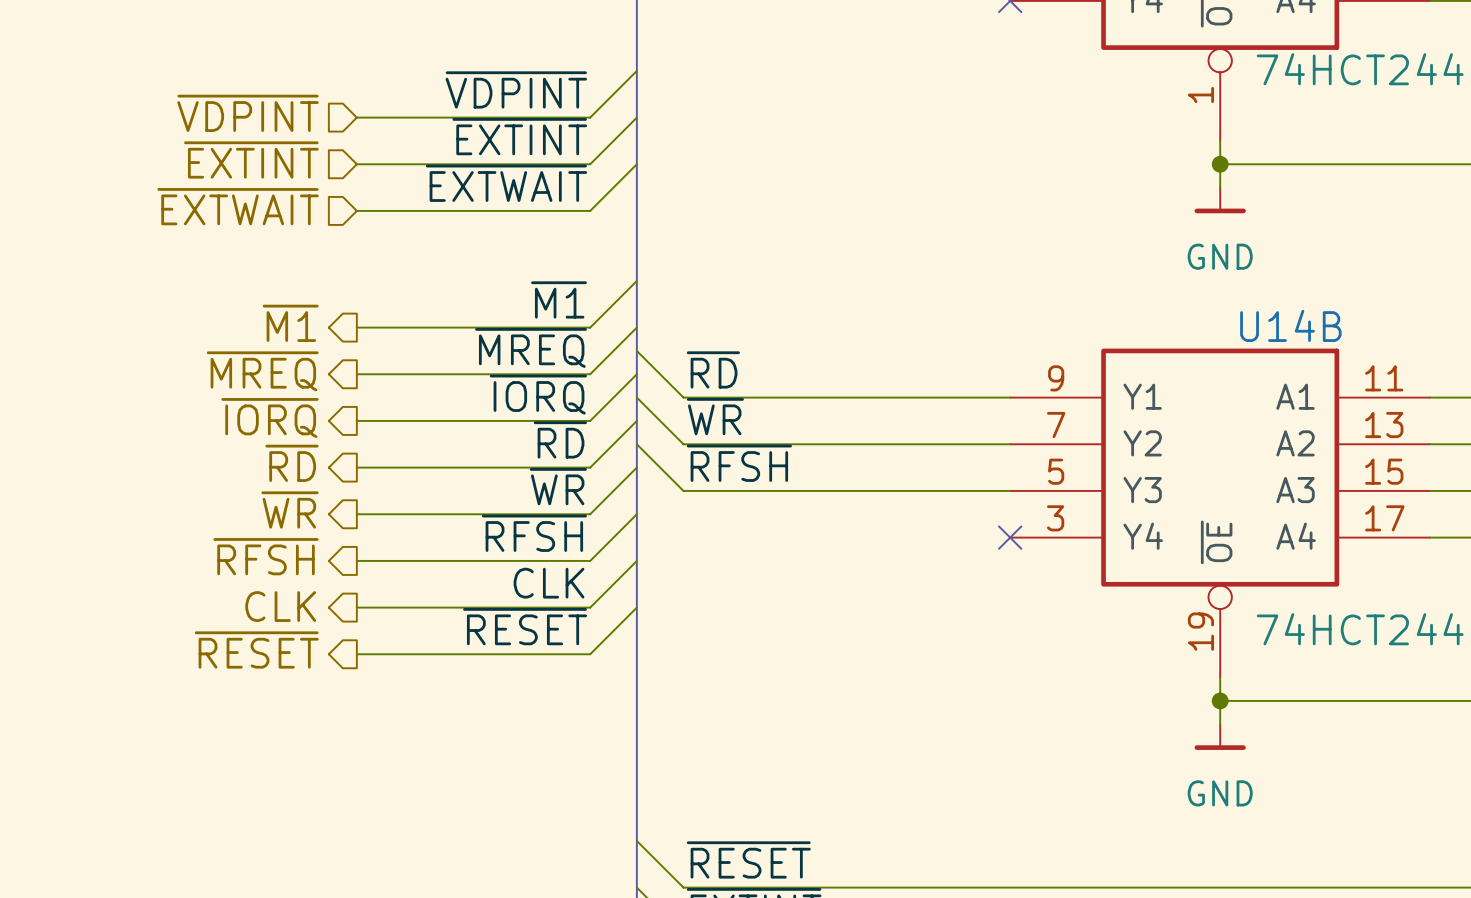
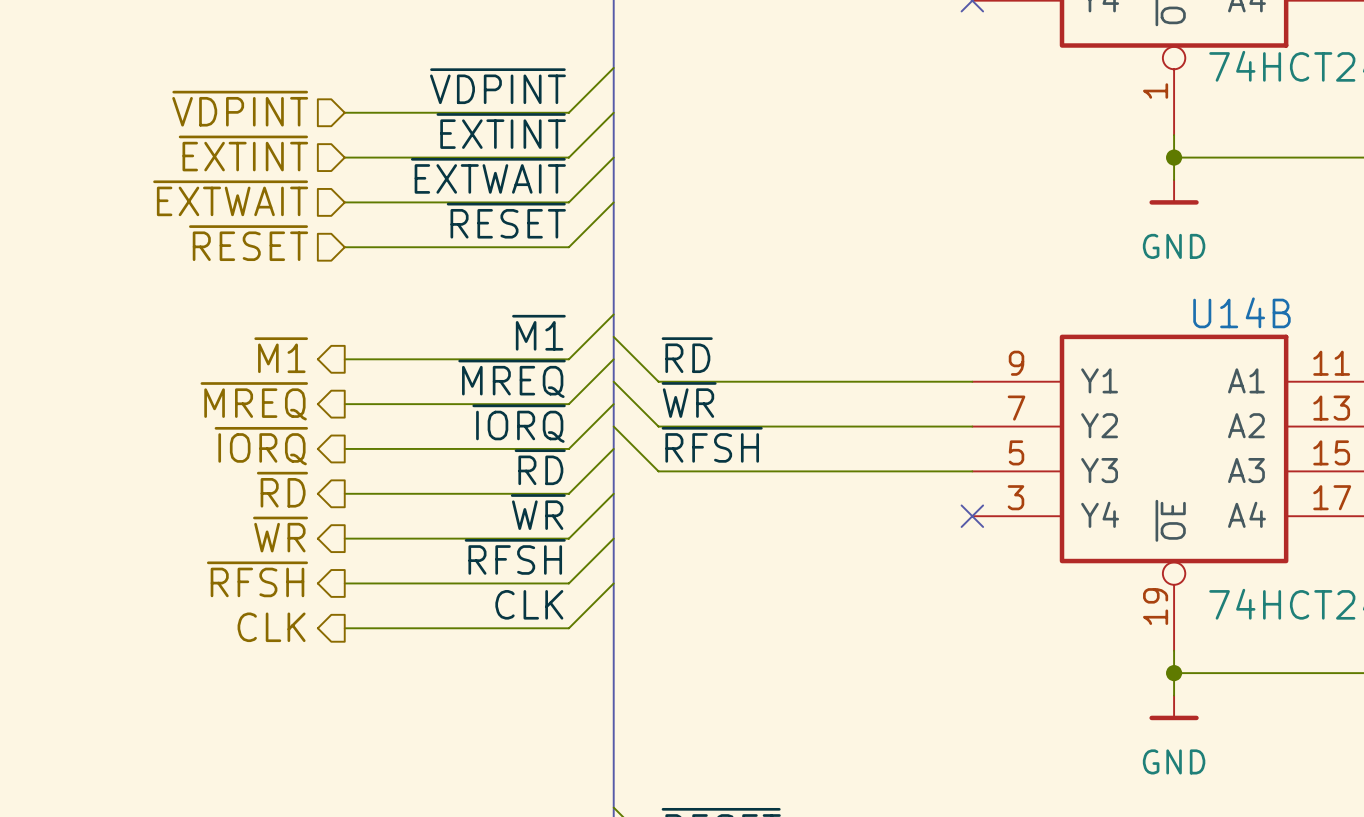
label: none -> ~{RESET} (506, 220)
hierarchical label: none -> ~{RESET} (248, 243)
wire: (636, 280) (590, 327) (356, 327) -> (613, 202) (568, 247) (344, 247)
label: ~{M1} (559, 299) -> none
hierarchical label: ~{M1} (290, 323) -> none
label: ~{MREQ} (531, 347) -> ~{M1} (538, 332)
hierarchical label: ~{MREQ} (262, 371) -> ~{M1} (281, 355)
label: ~{IORQ} (538, 394) -> ~{MREQ} (512, 378)
hierarchical label: ~{IORQ} (270, 418) -> ~{MREQ} (254, 401)
label: ~{RD} (560, 439) -> ~{IORQ} (519, 423)
hierarchical label: ~{RD} (292, 463) -> ~{IORQ} (261, 446)
label: ~{WR} (558, 486) -> ~{RD} (540, 467)
hierarchical label: ~{WR} (290, 510) -> ~{RD} (282, 489)
label: ~{RFSH} (534, 533) -> ~{WR} (538, 512)
hierarchical label: ~{RFSH} (266, 556) -> ~{WR} (280, 534)
label: CLK (549, 583) -> ~{RFSH} (515, 556)
hierarchical label: CLK (280, 606) -> ~{RFSH} (257, 579)
label: ~{RESET} (525, 626) -> CLK (529, 604)
hierarchical label: ~{RESET} (256, 650) -> CLK (271, 627)

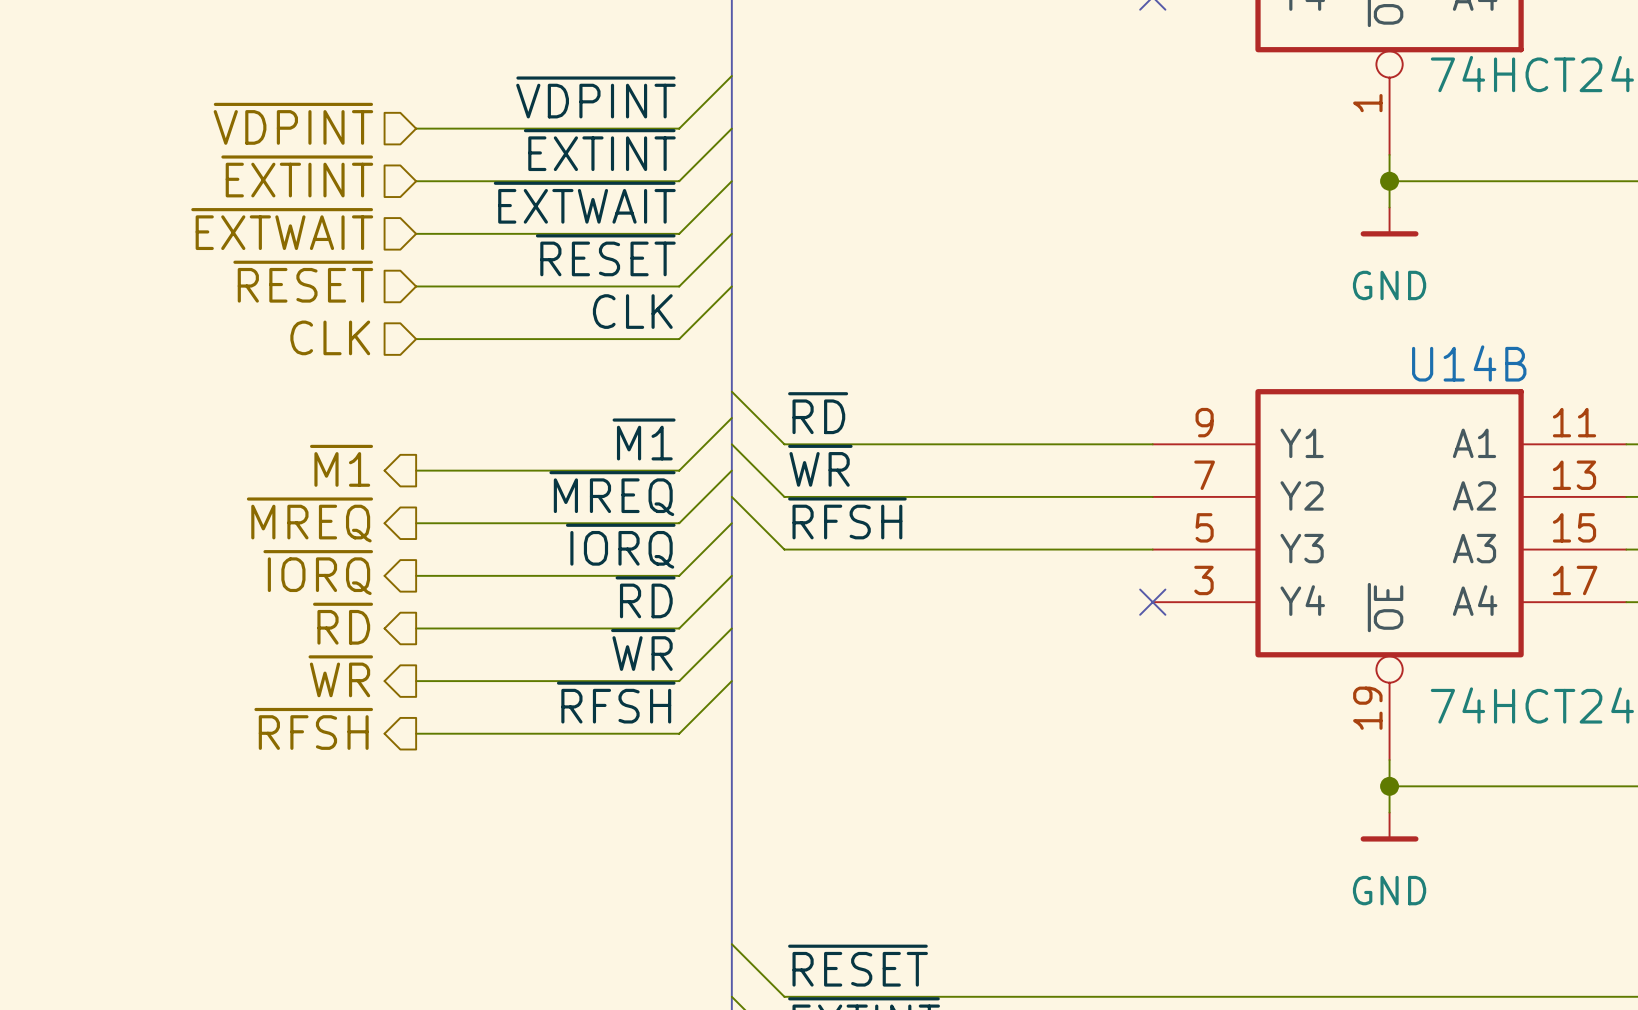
label: none -> CLK (632, 311)
hierarchical label: none -> CLK (330, 337)
wire: (613, 314) (568, 359) (344, 359) -> (731, 286) (679, 339) (416, 339)
label: ~{M1} (538, 332) -> none
hierarchical label: ~{M1} (281, 355) -> none
label: ~{MREQ} (512, 378) -> ~{M1} (644, 439)
hierarchical label: ~{MREQ} (254, 401) -> ~{M1} (341, 465)
label: ~{IORQ} (519, 423) -> ~{MREQ} (612, 493)
hierarchical label: ~{IORQ} (261, 446) -> ~{MREQ} (309, 519)
label: ~{RD} (540, 467) -> ~{IORQ} (620, 546)
hierarchical label: ~{RD} (282, 489) -> ~{IORQ} (318, 572)
label: ~{WR} (538, 512) -> ~{RD} (645, 597)
hierarchical label: ~{WR} (280, 534) -> ~{RD} (343, 623)
label: ~{RFSH} (515, 556) -> ~{WR} (643, 649)
hierarchical label: ~{RFSH} (257, 579) -> ~{WR} (340, 676)
label: CLK (529, 604) -> ~{RFSH} (616, 702)
hierarchical label: CLK (271, 627) -> ~{RFSH} (313, 728)

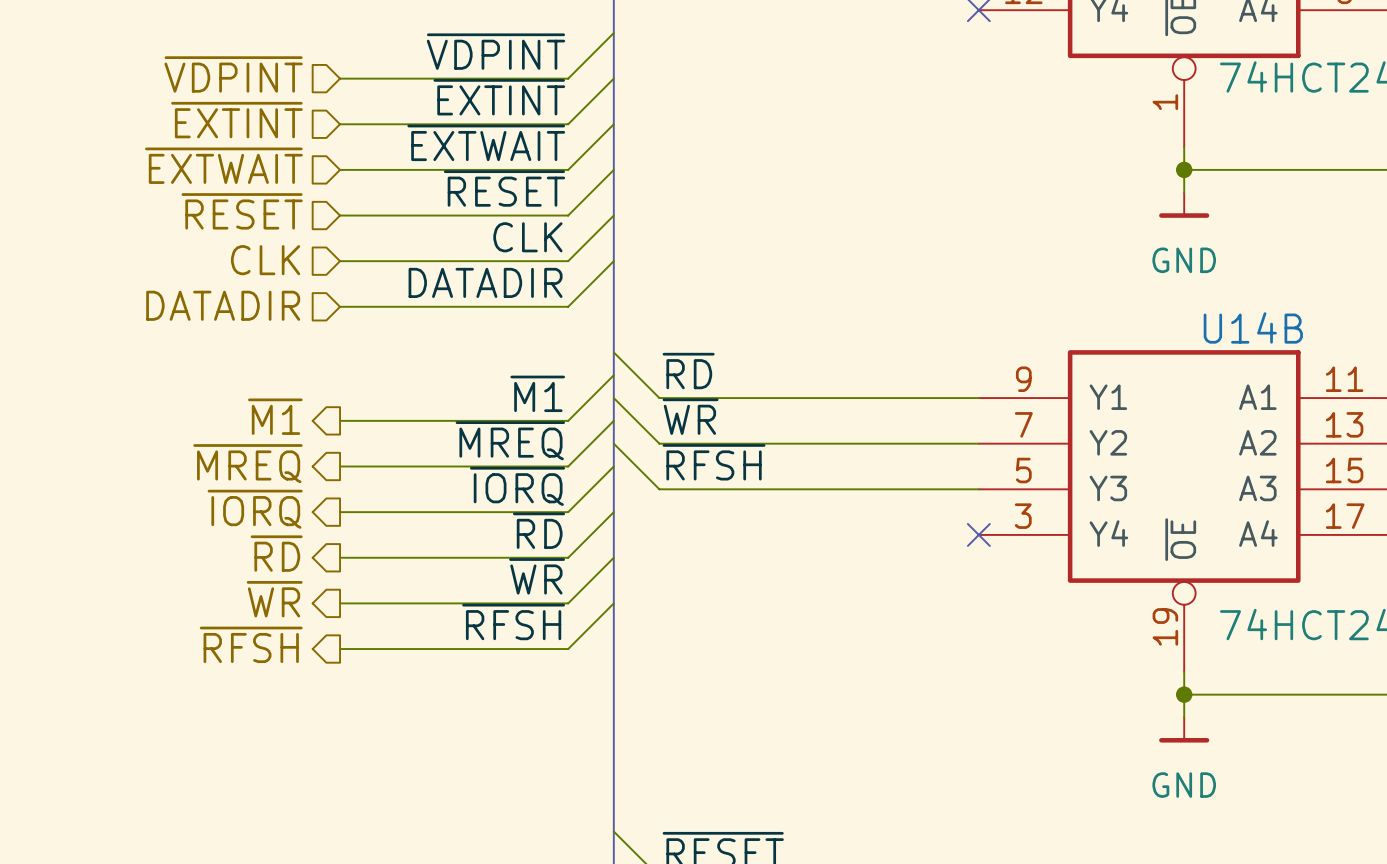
wire: none -> (613, 33) (568, 78) (340, 78)
label: none -> ~{VDPINT} (495, 51)
hierarchical label: none -> ~{VDPINT} (233, 74)
label: ~{VDPINT} (595, 97) -> ~{EXTINT} (499, 97)
hierarchical label: ~{VDPINT} (293, 123) -> ~{EXTINT} (236, 120)
label: ~{EXTINT} (599, 150) -> ~{EXTWAIT} (486, 142)
hierarchical label: ~{EXTINT} (297, 176) -> ~{EXTWAIT} (223, 165)
label: ~{EXTWAIT} (584, 202) -> ~{RESET} (504, 188)
hierarchical label: ~{EXTWAIT} (282, 229) -> ~{RESET} (242, 211)
label: ~{RESET} (605, 255) -> CLK (527, 237)
hierarchical label: ~{RESET} (303, 281) -> CLK (265, 260)
label: CLK (632, 311) -> DATADIR (485, 282)
hierarchical label: CLK (330, 337) -> DATADIR (223, 305)

